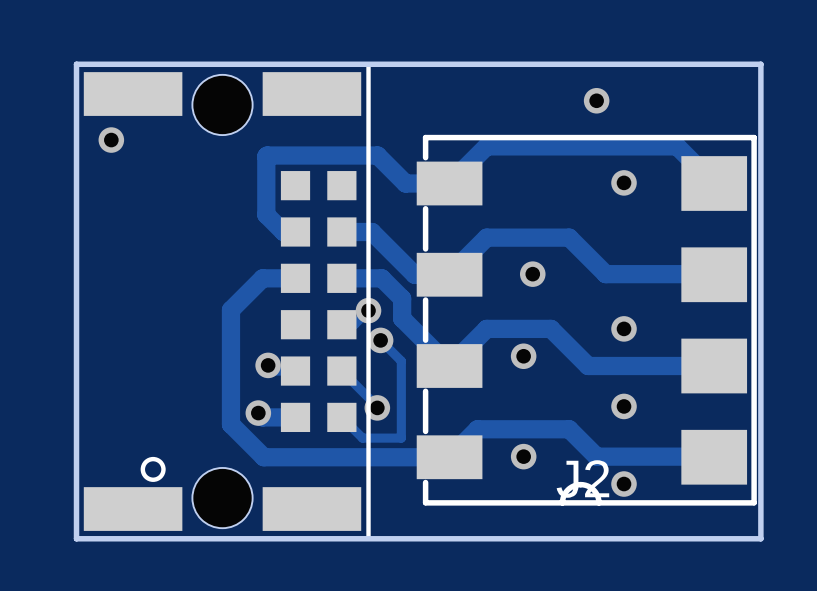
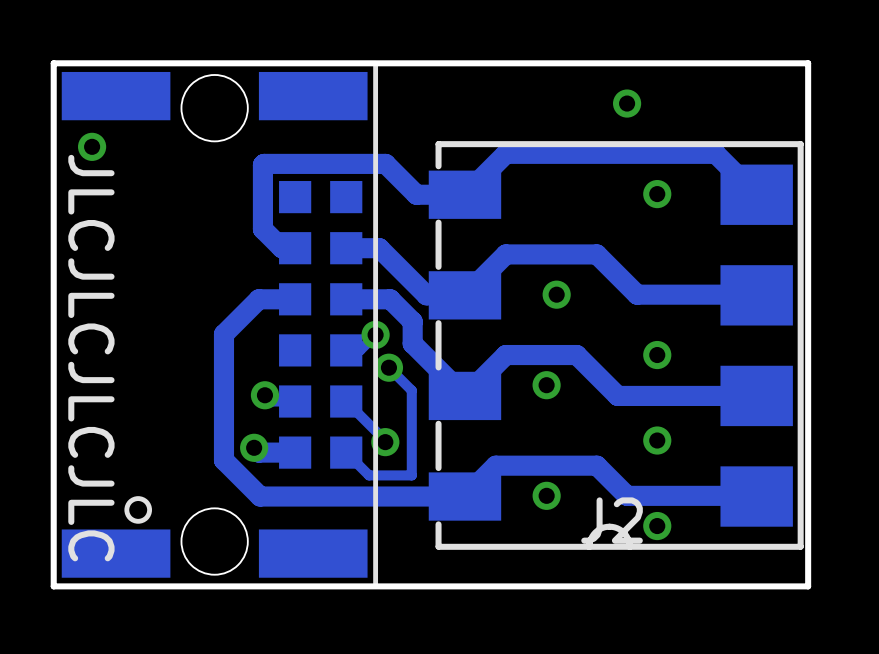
text: none -> JLCJLCJLCJLC (91, 358)

